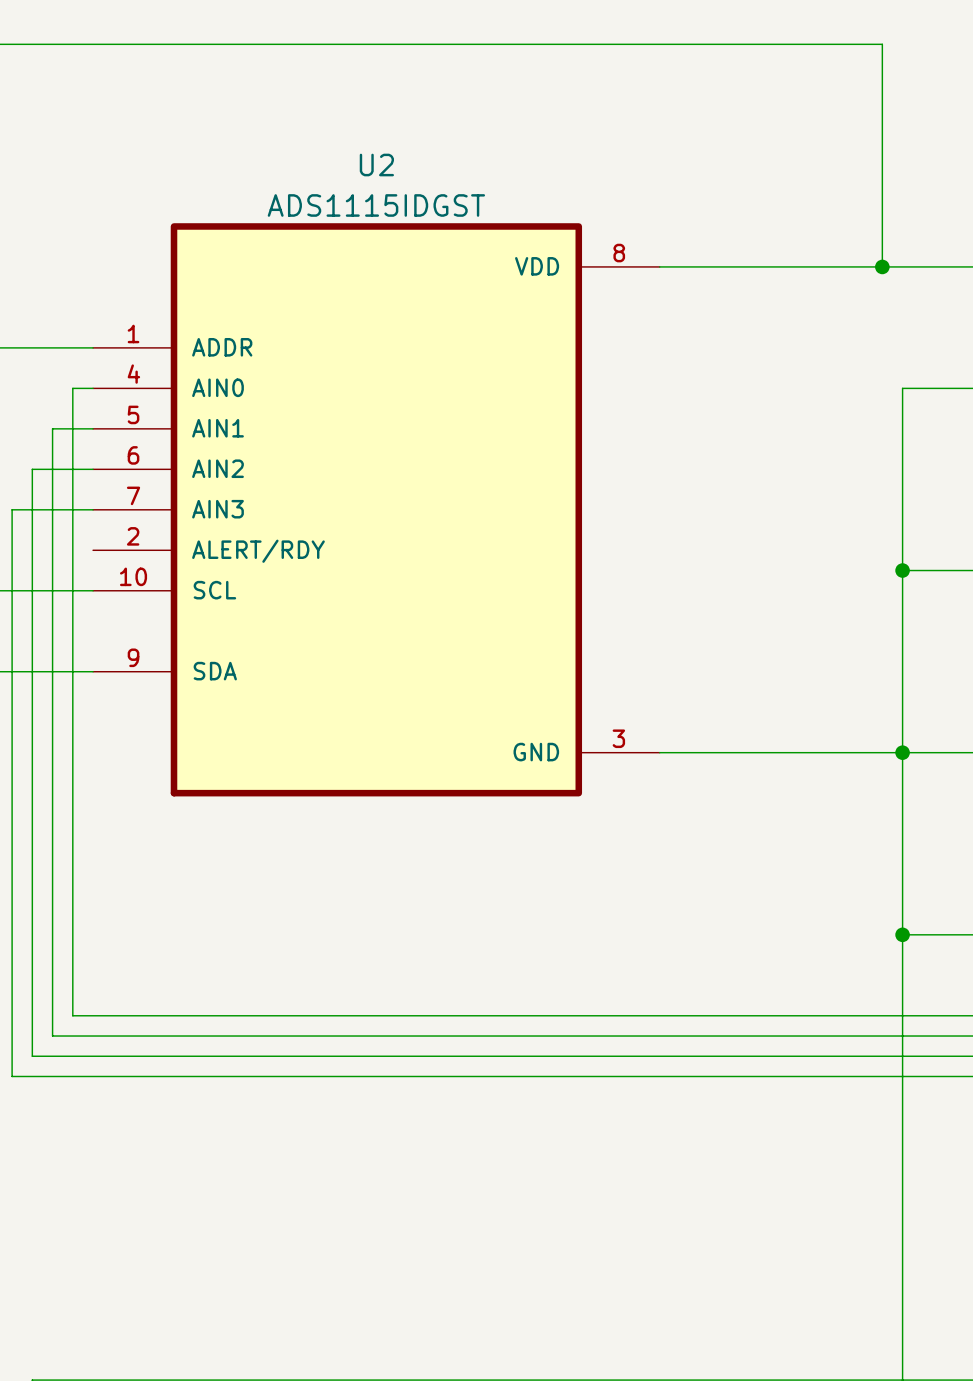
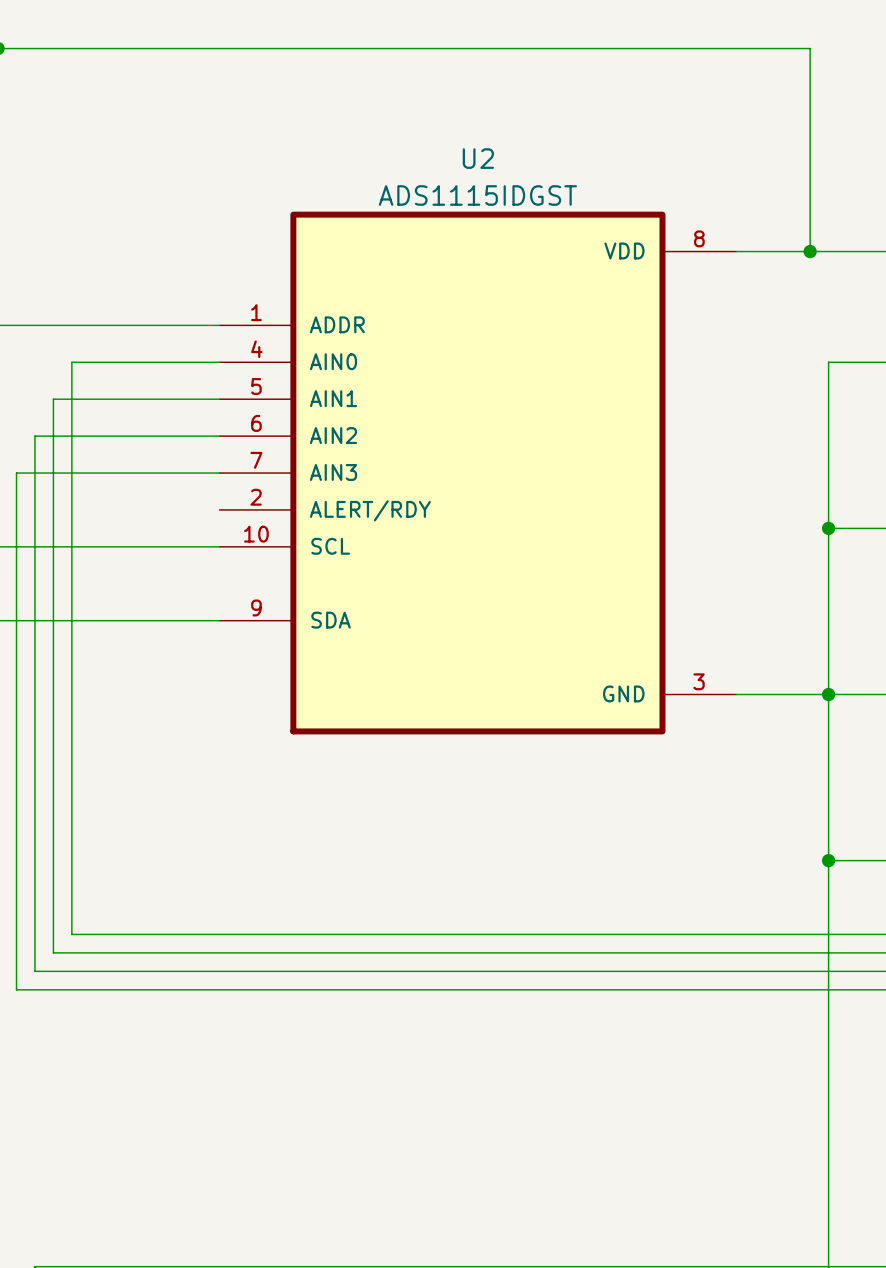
U2 position: (376, 509) -> (477, 473)

